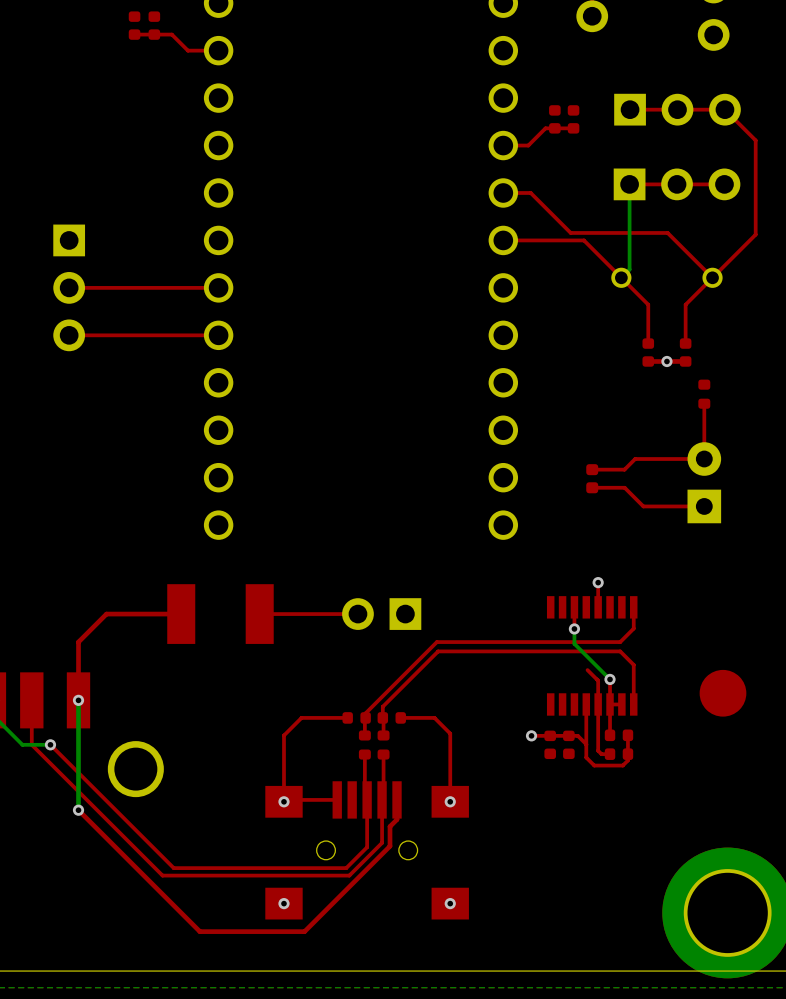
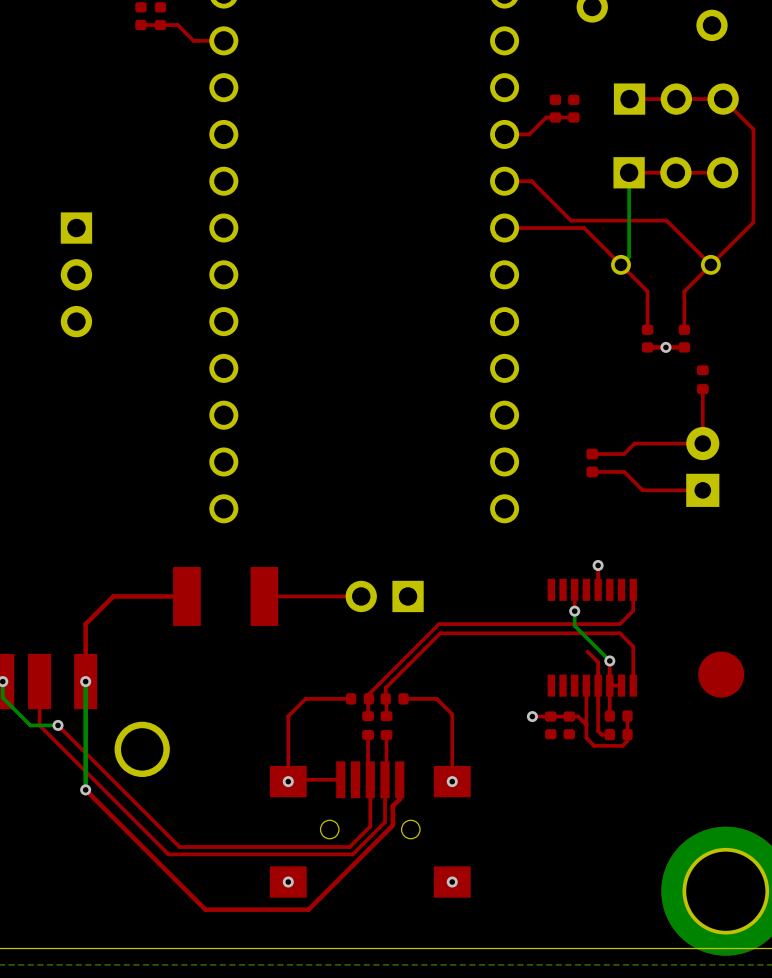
top track: (218, 287) (69, 287) -> none
top track: (218, 335) (69, 335) -> none

